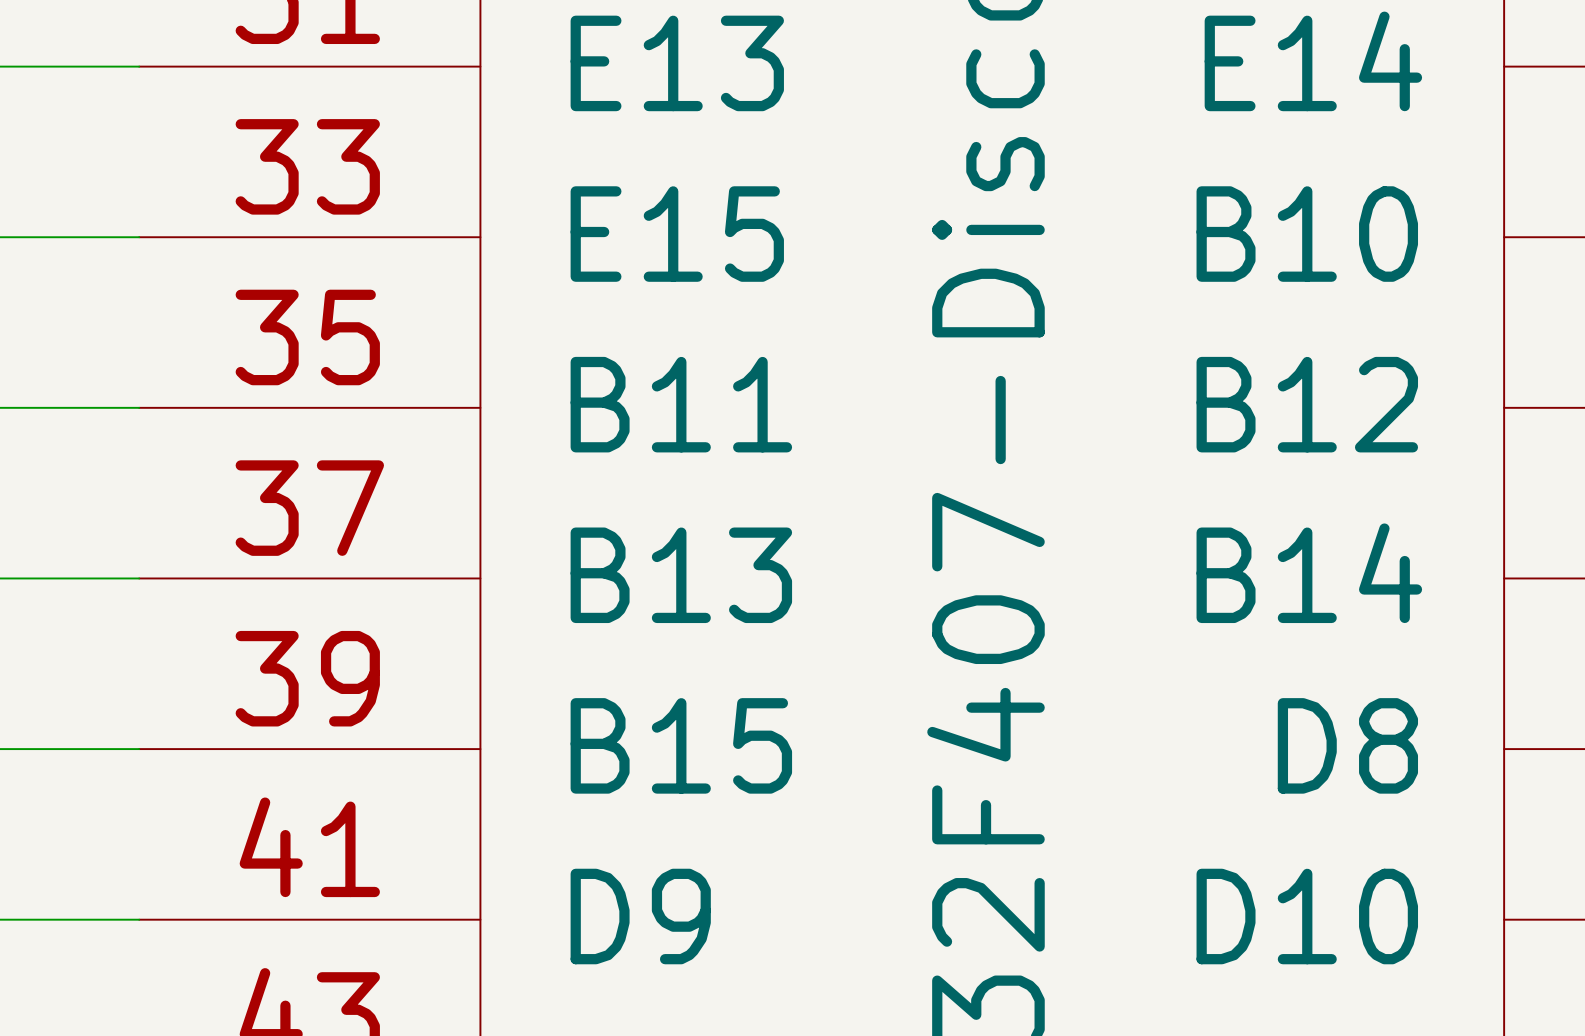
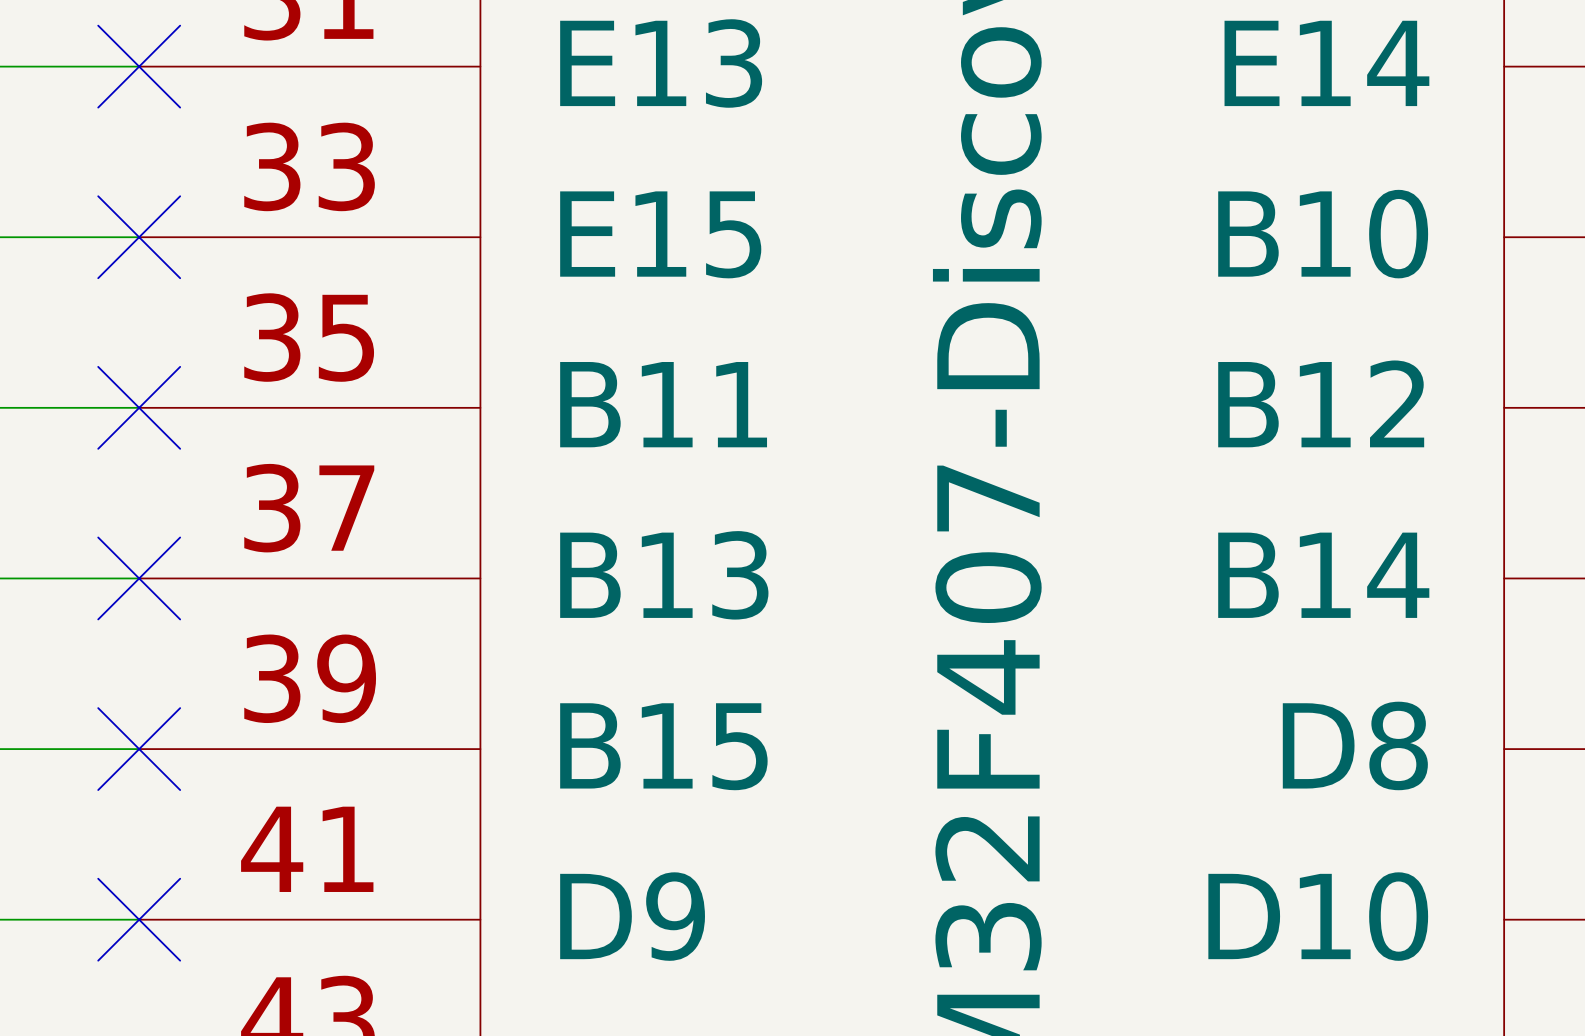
no-connect mark: none -> (139, 66)
no-connect mark: none -> (139, 237)
no-connect mark: none -> (139, 407)
no-connect mark: none -> (139, 578)
no-connect mark: none -> (139, 749)
no-connect mark: none -> (139, 919)

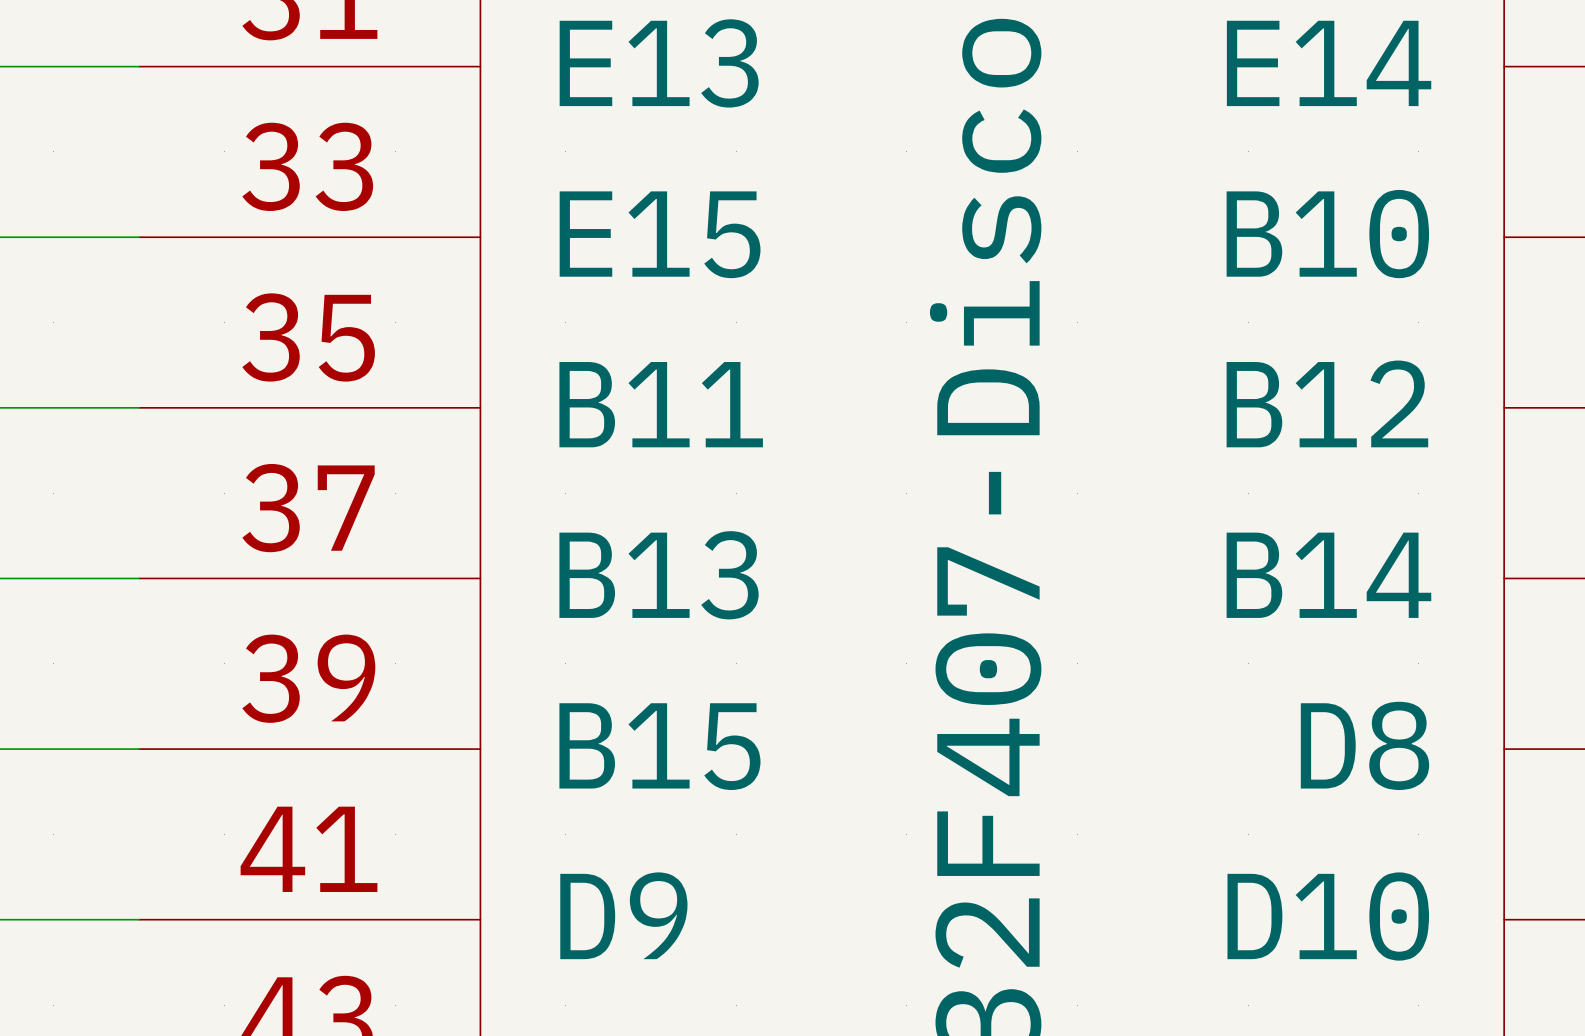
no-connect mark: (139, 66) -> none
no-connect mark: (139, 237) -> none
no-connect mark: (139, 407) -> none
no-connect mark: (139, 578) -> none
no-connect mark: (139, 749) -> none
no-connect mark: (139, 919) -> none

